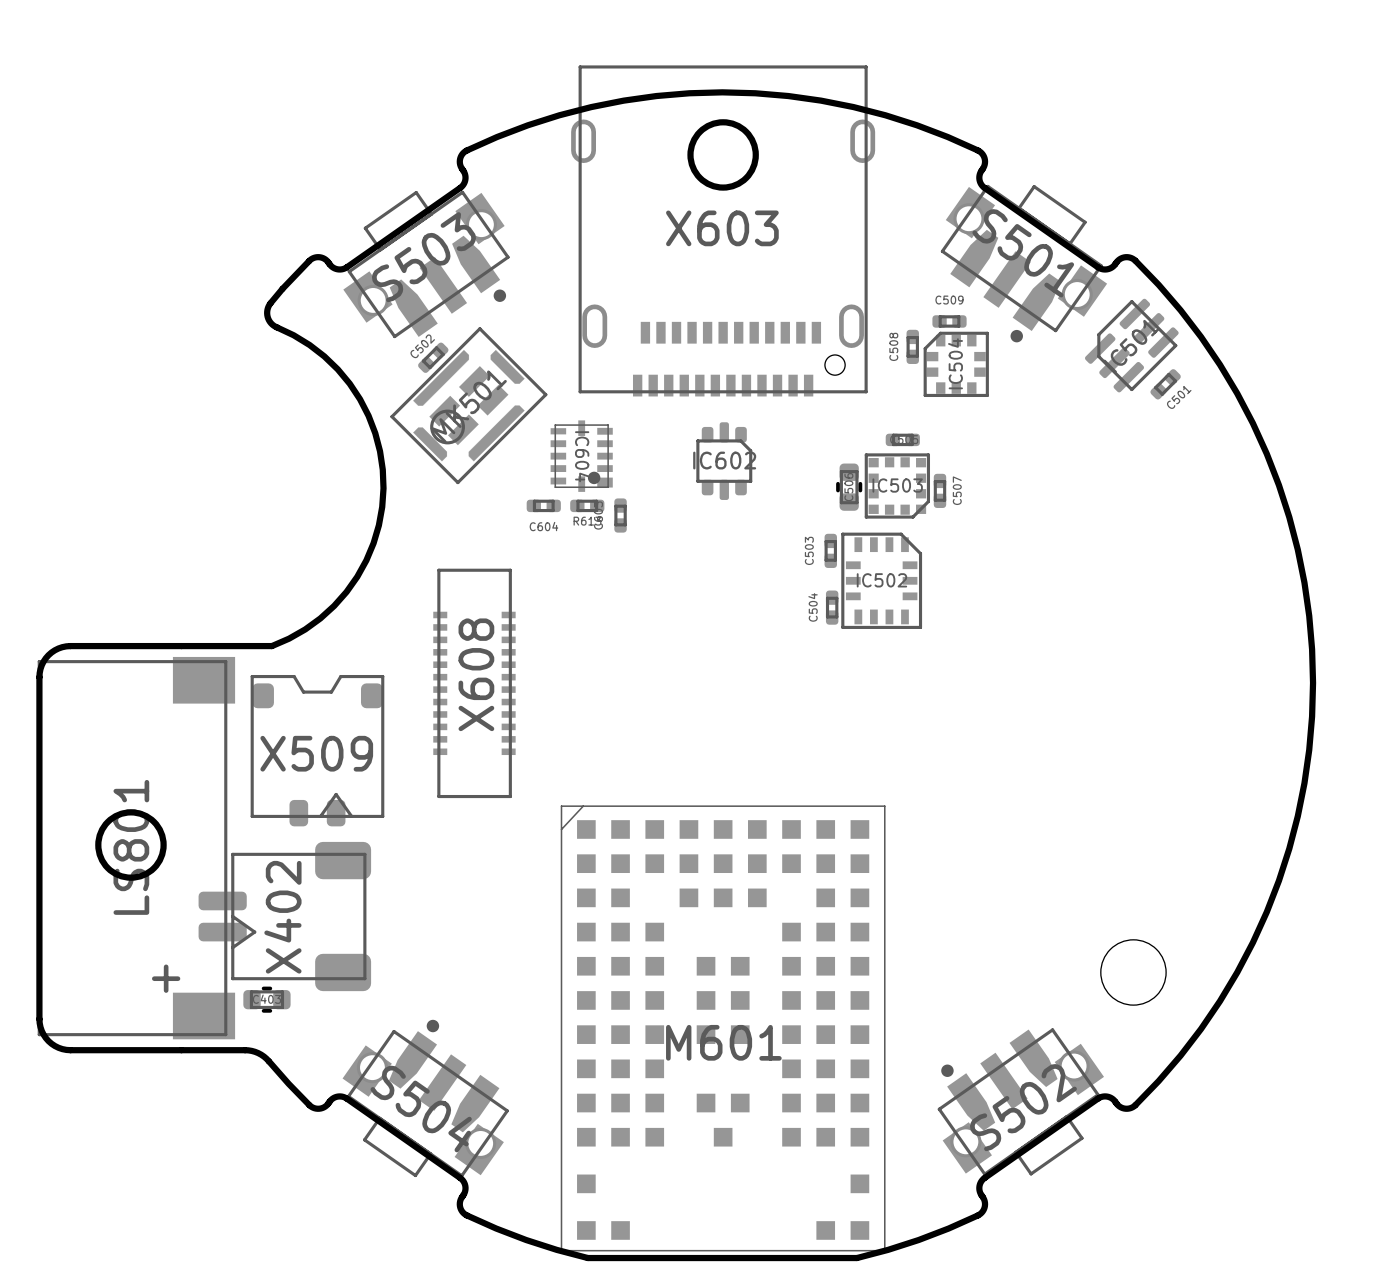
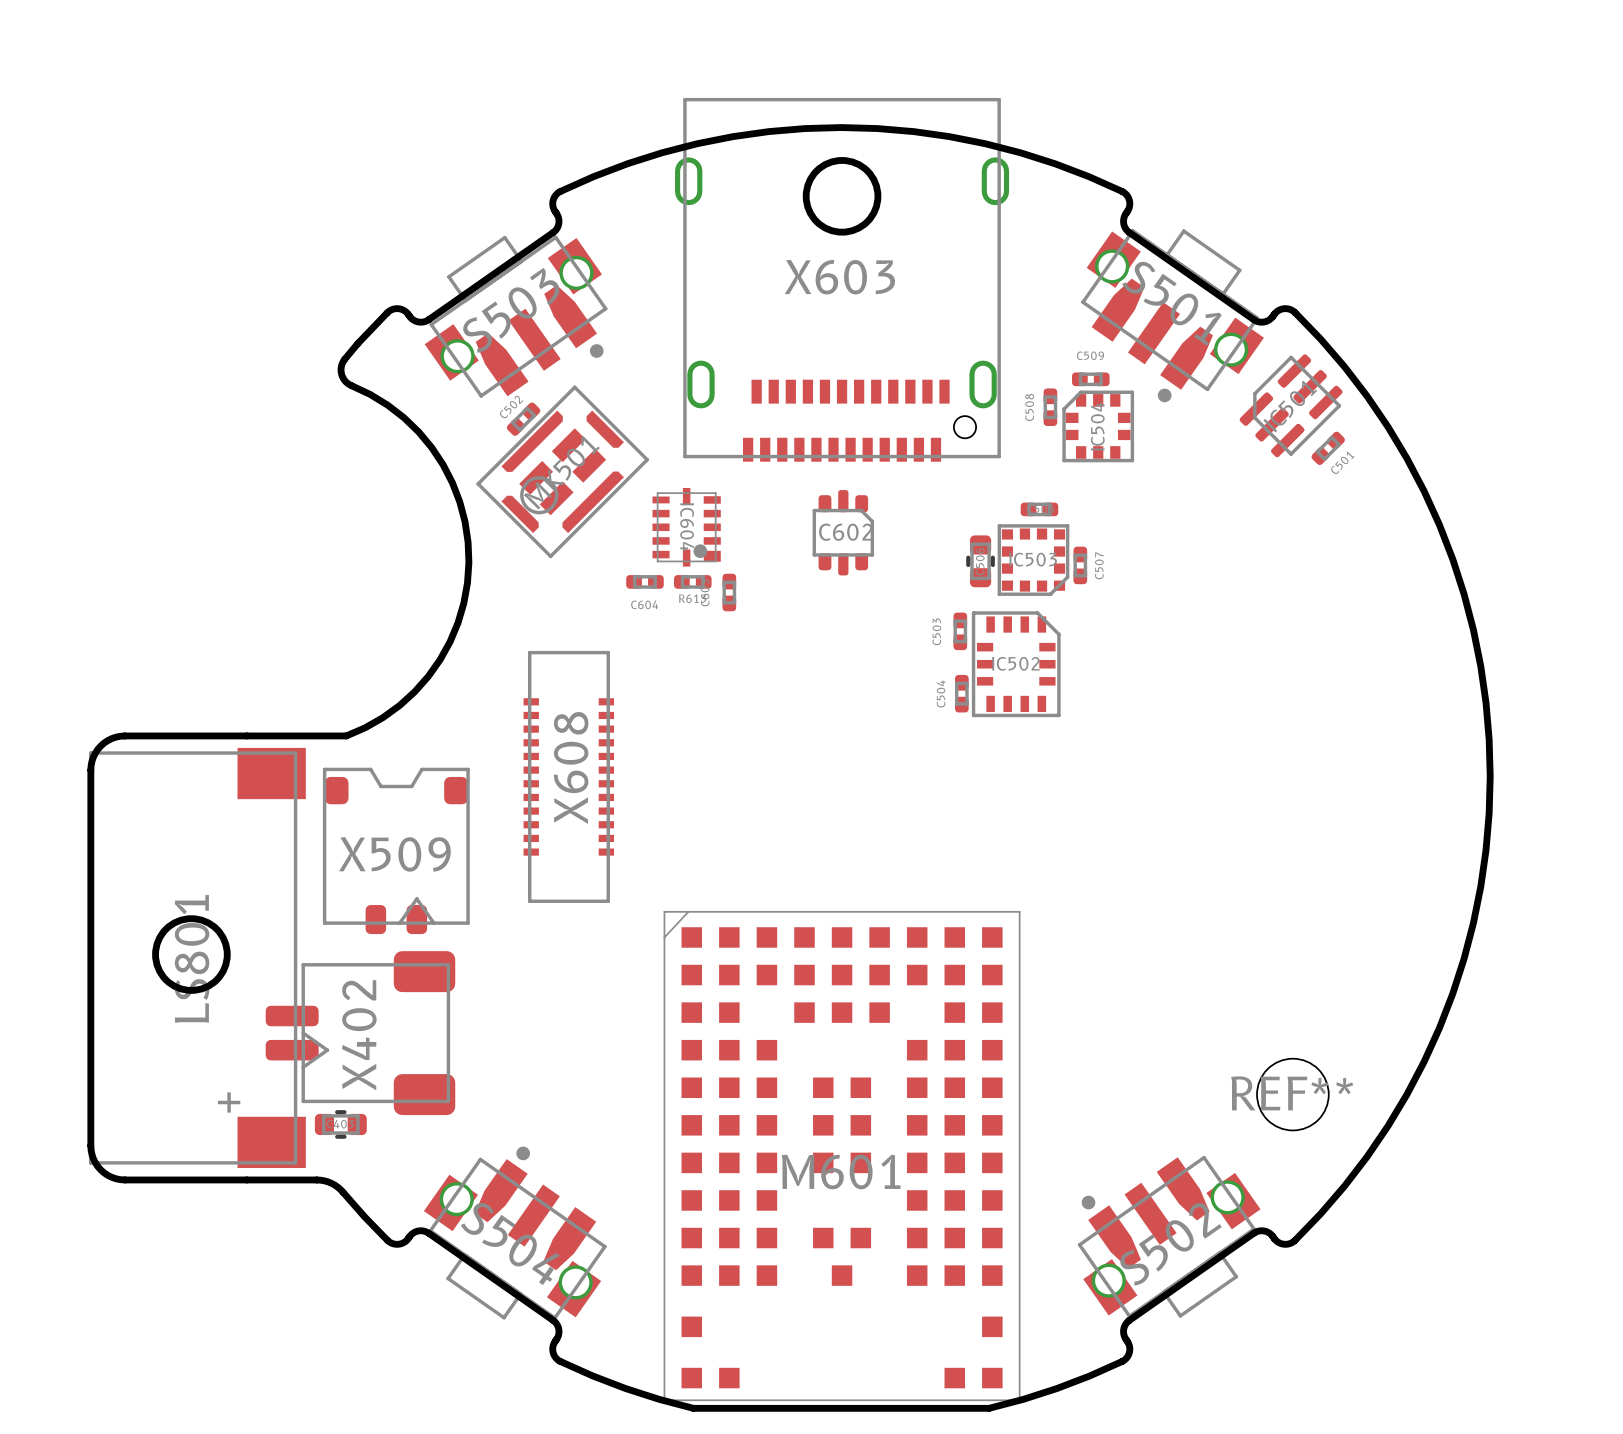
REF** name: none -> REF** (1292, 1093)

